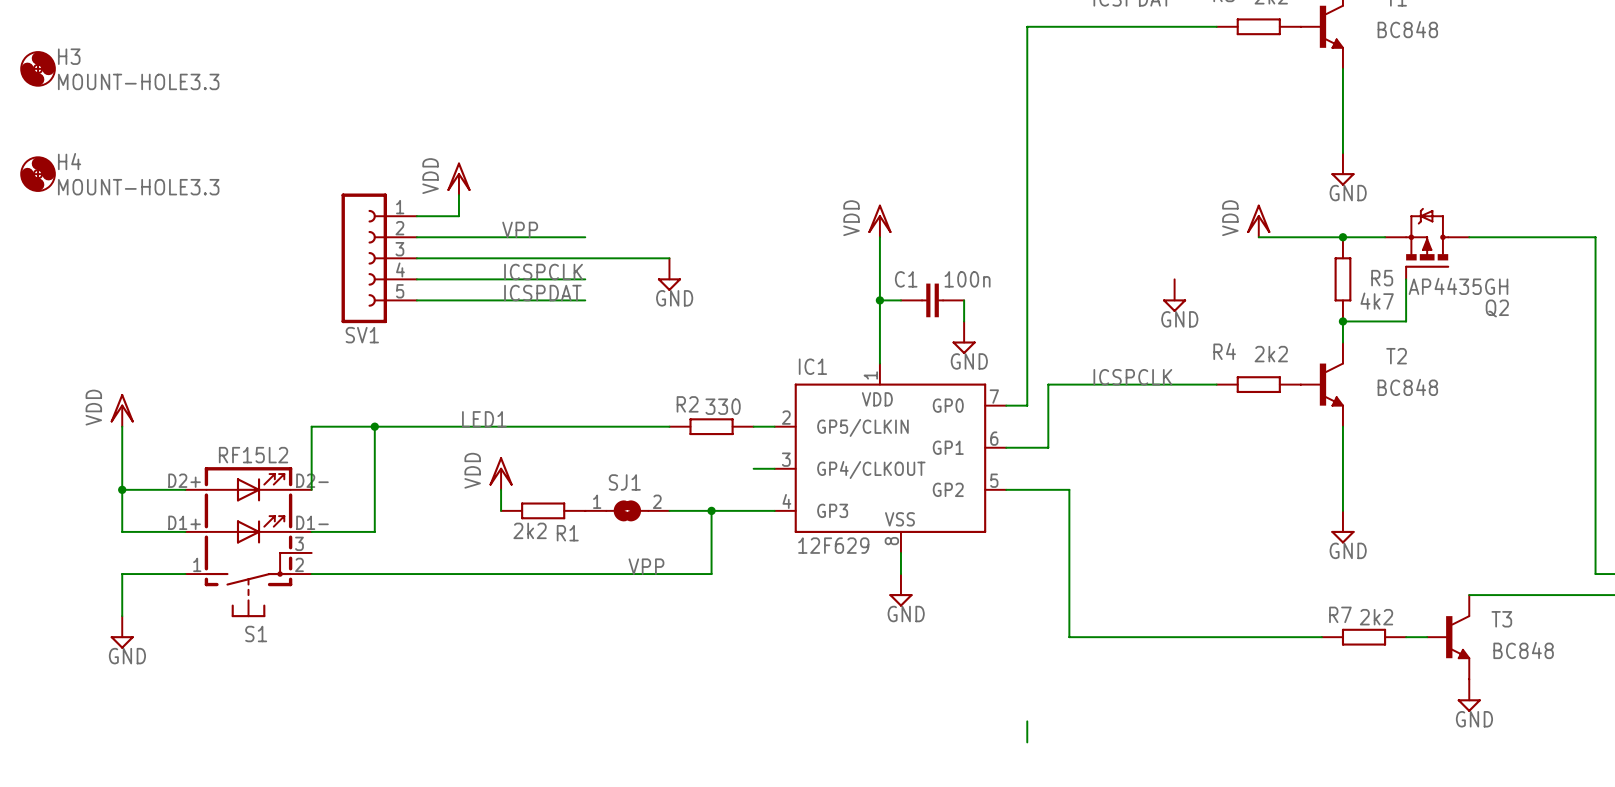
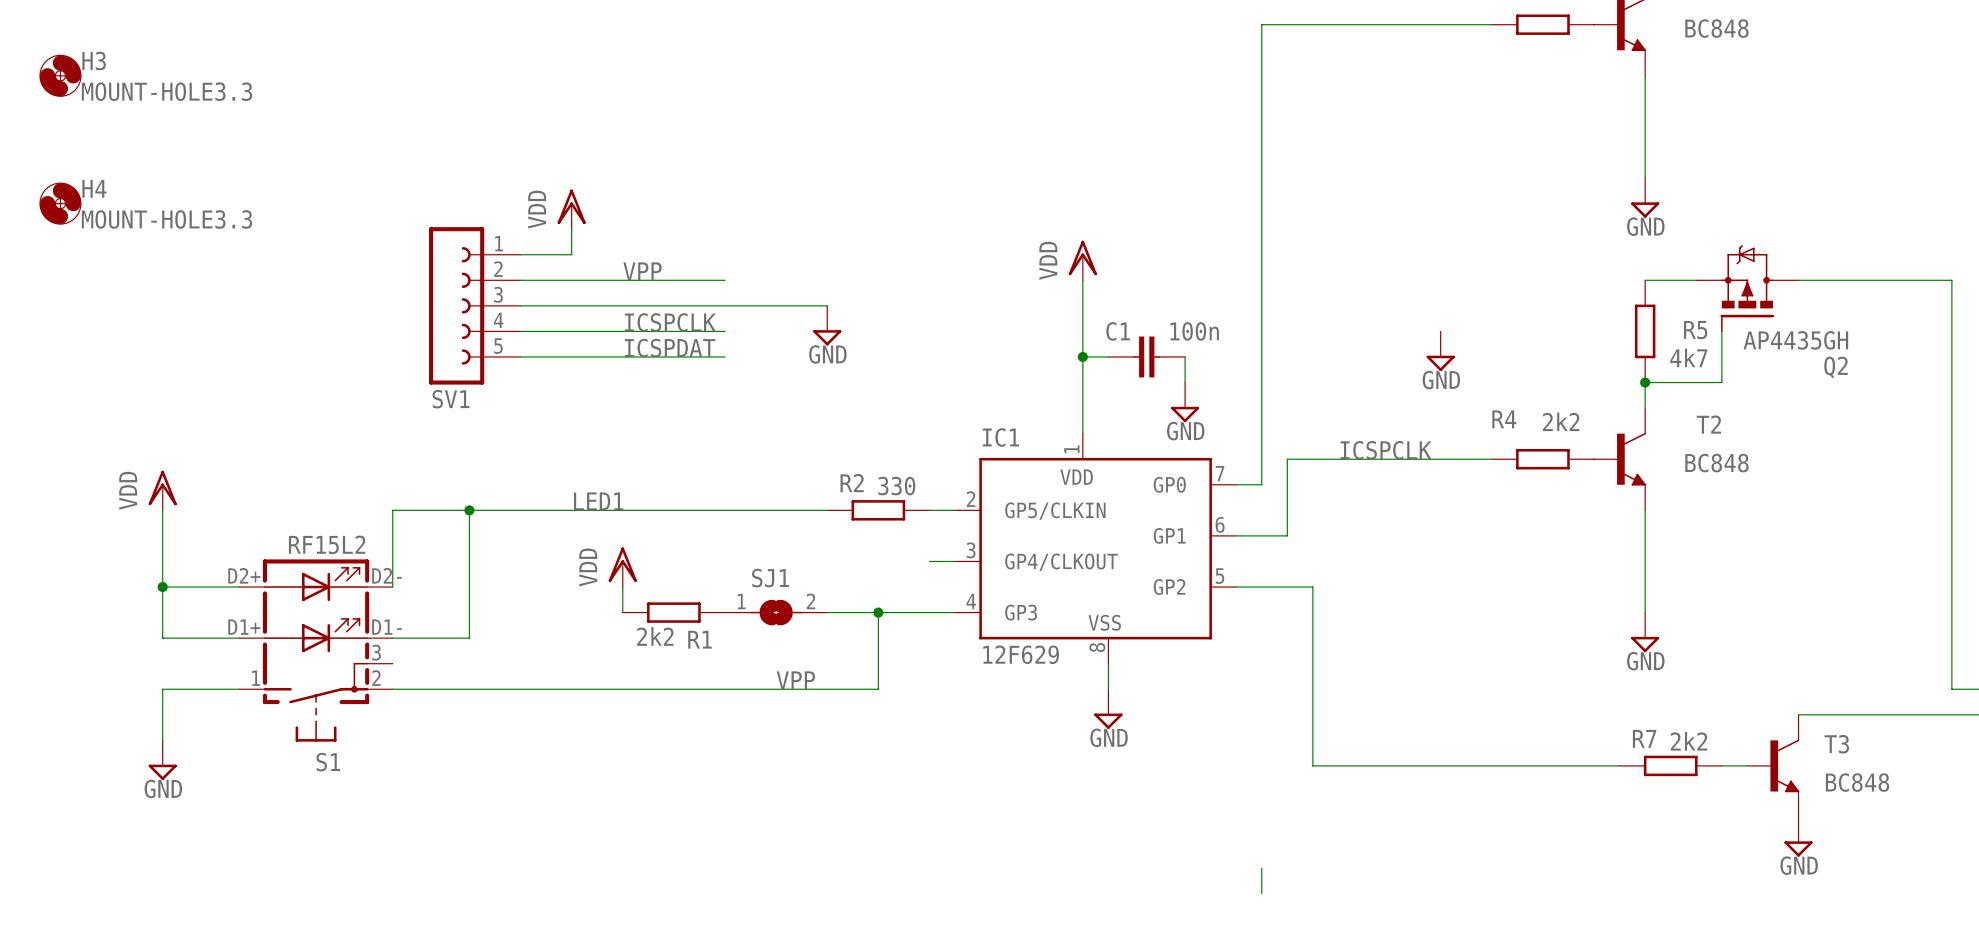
power symbol: VDD (1258, 220) -> none
wire: (1258, 237) (1342, 237) -> none
junction: (1342, 237) -> none

